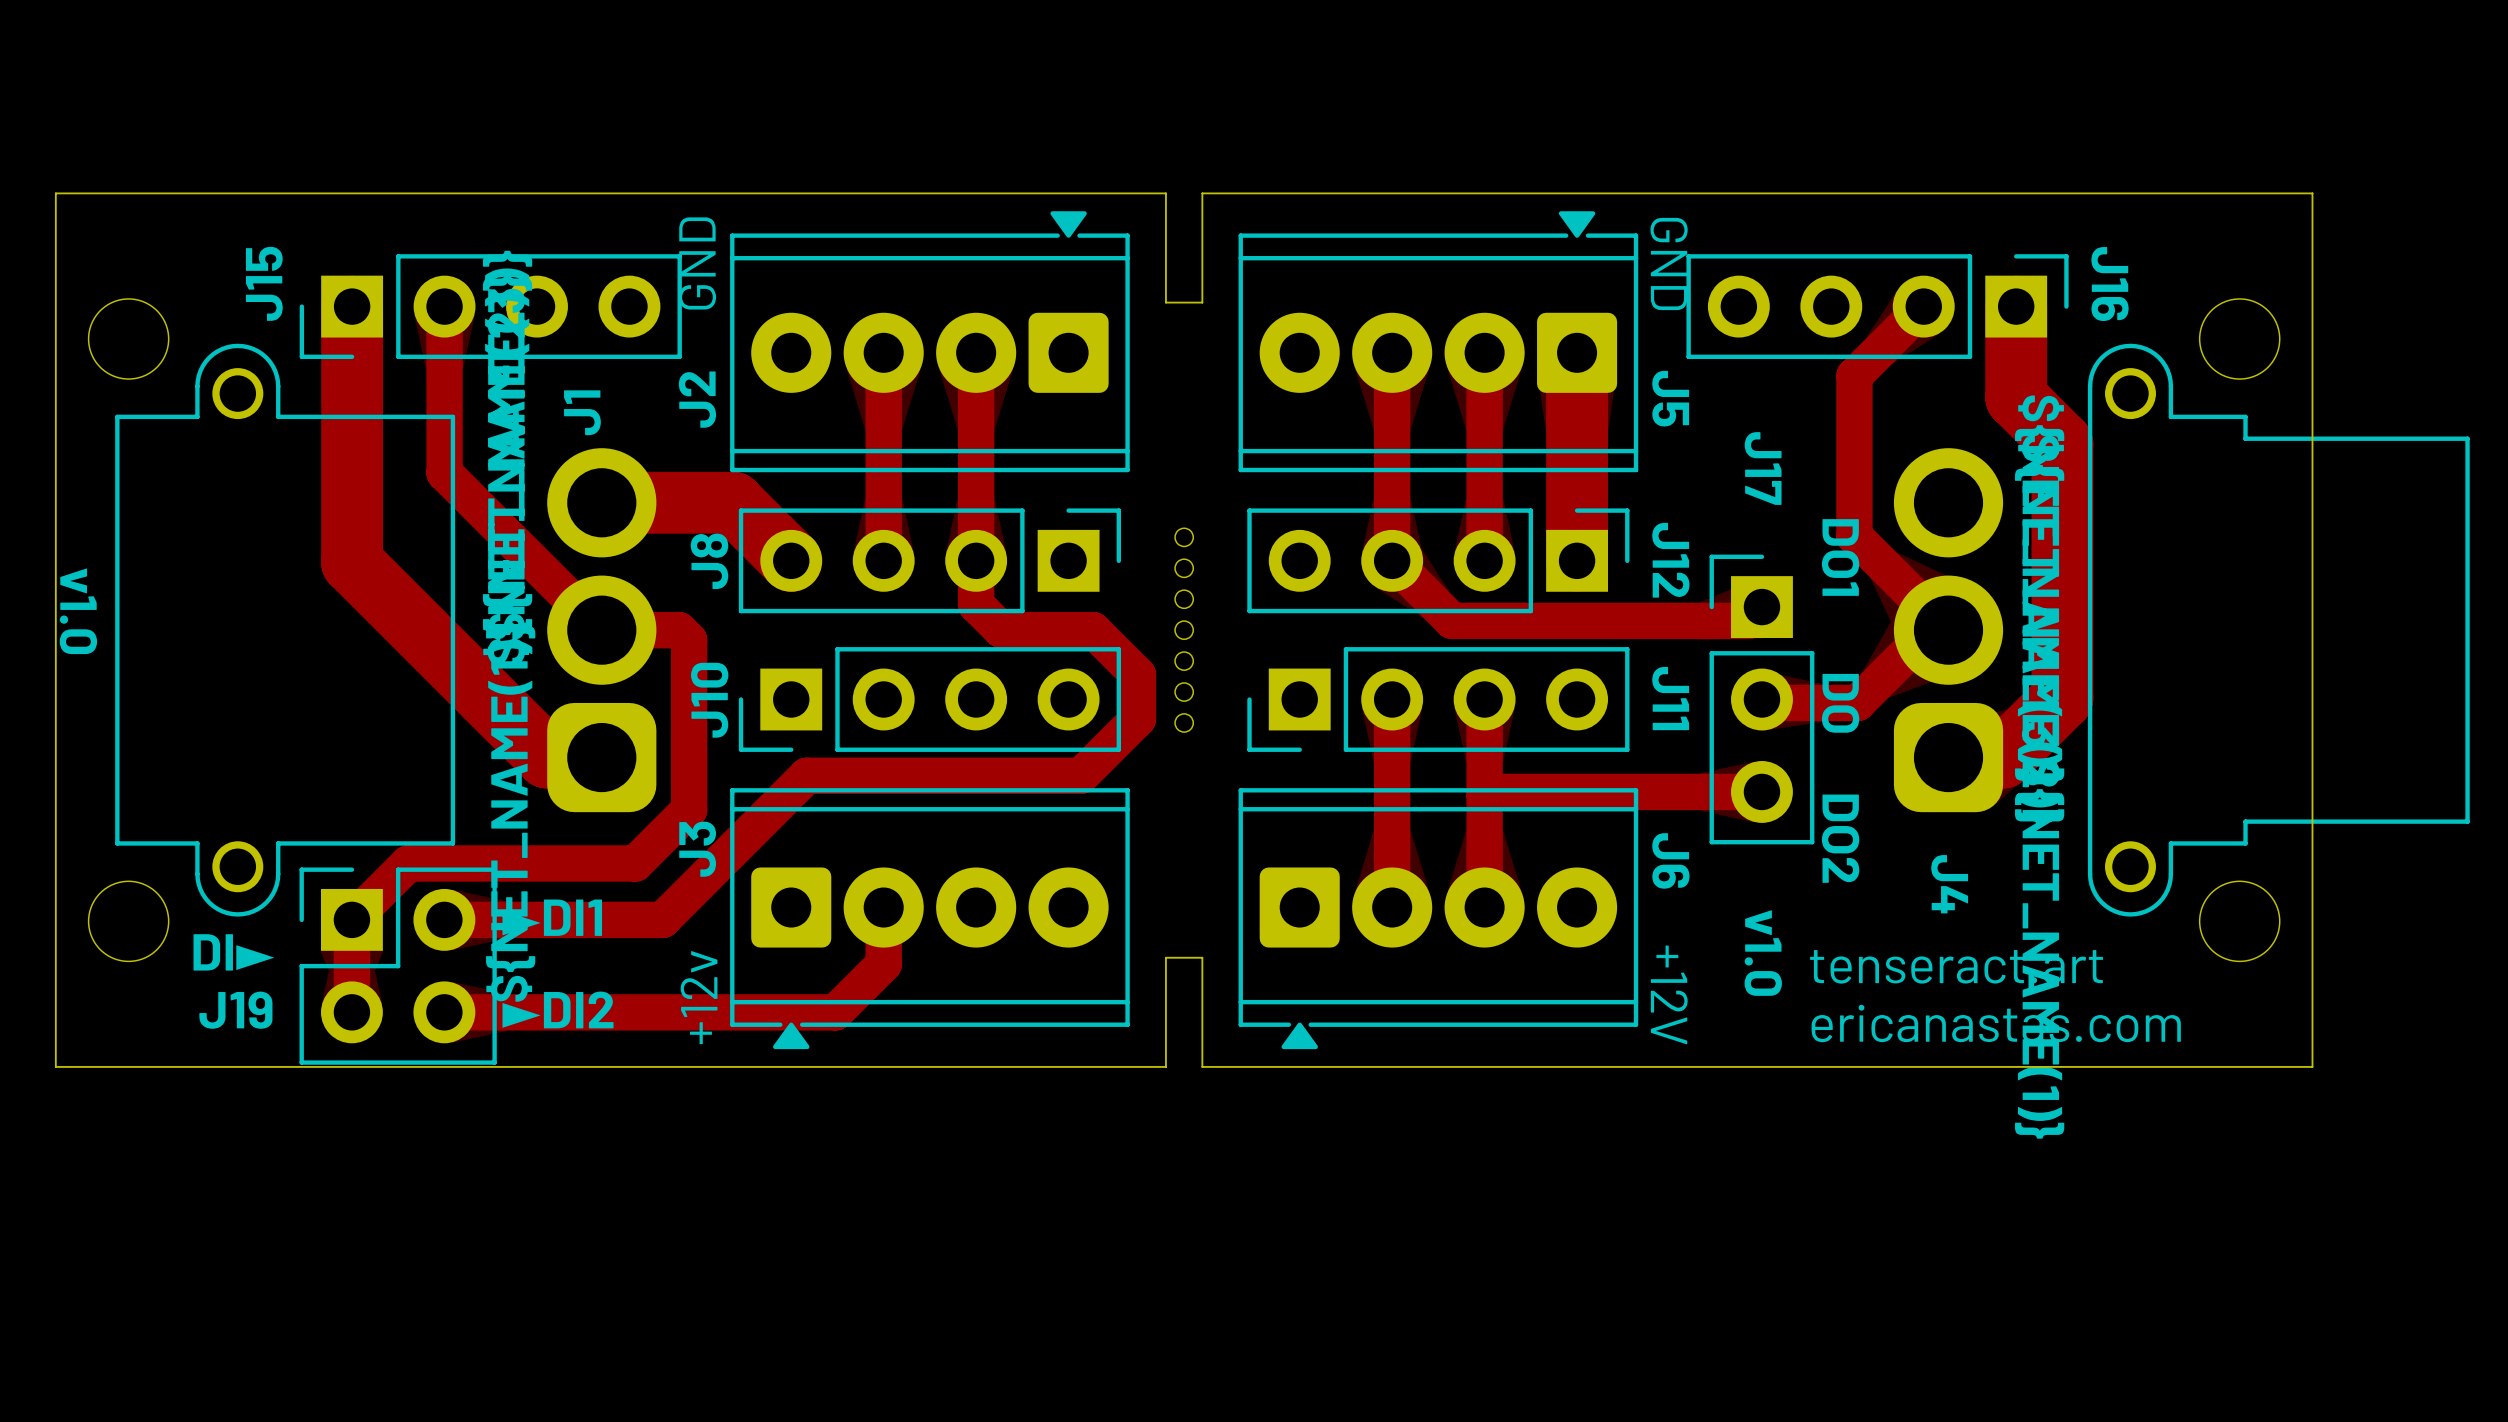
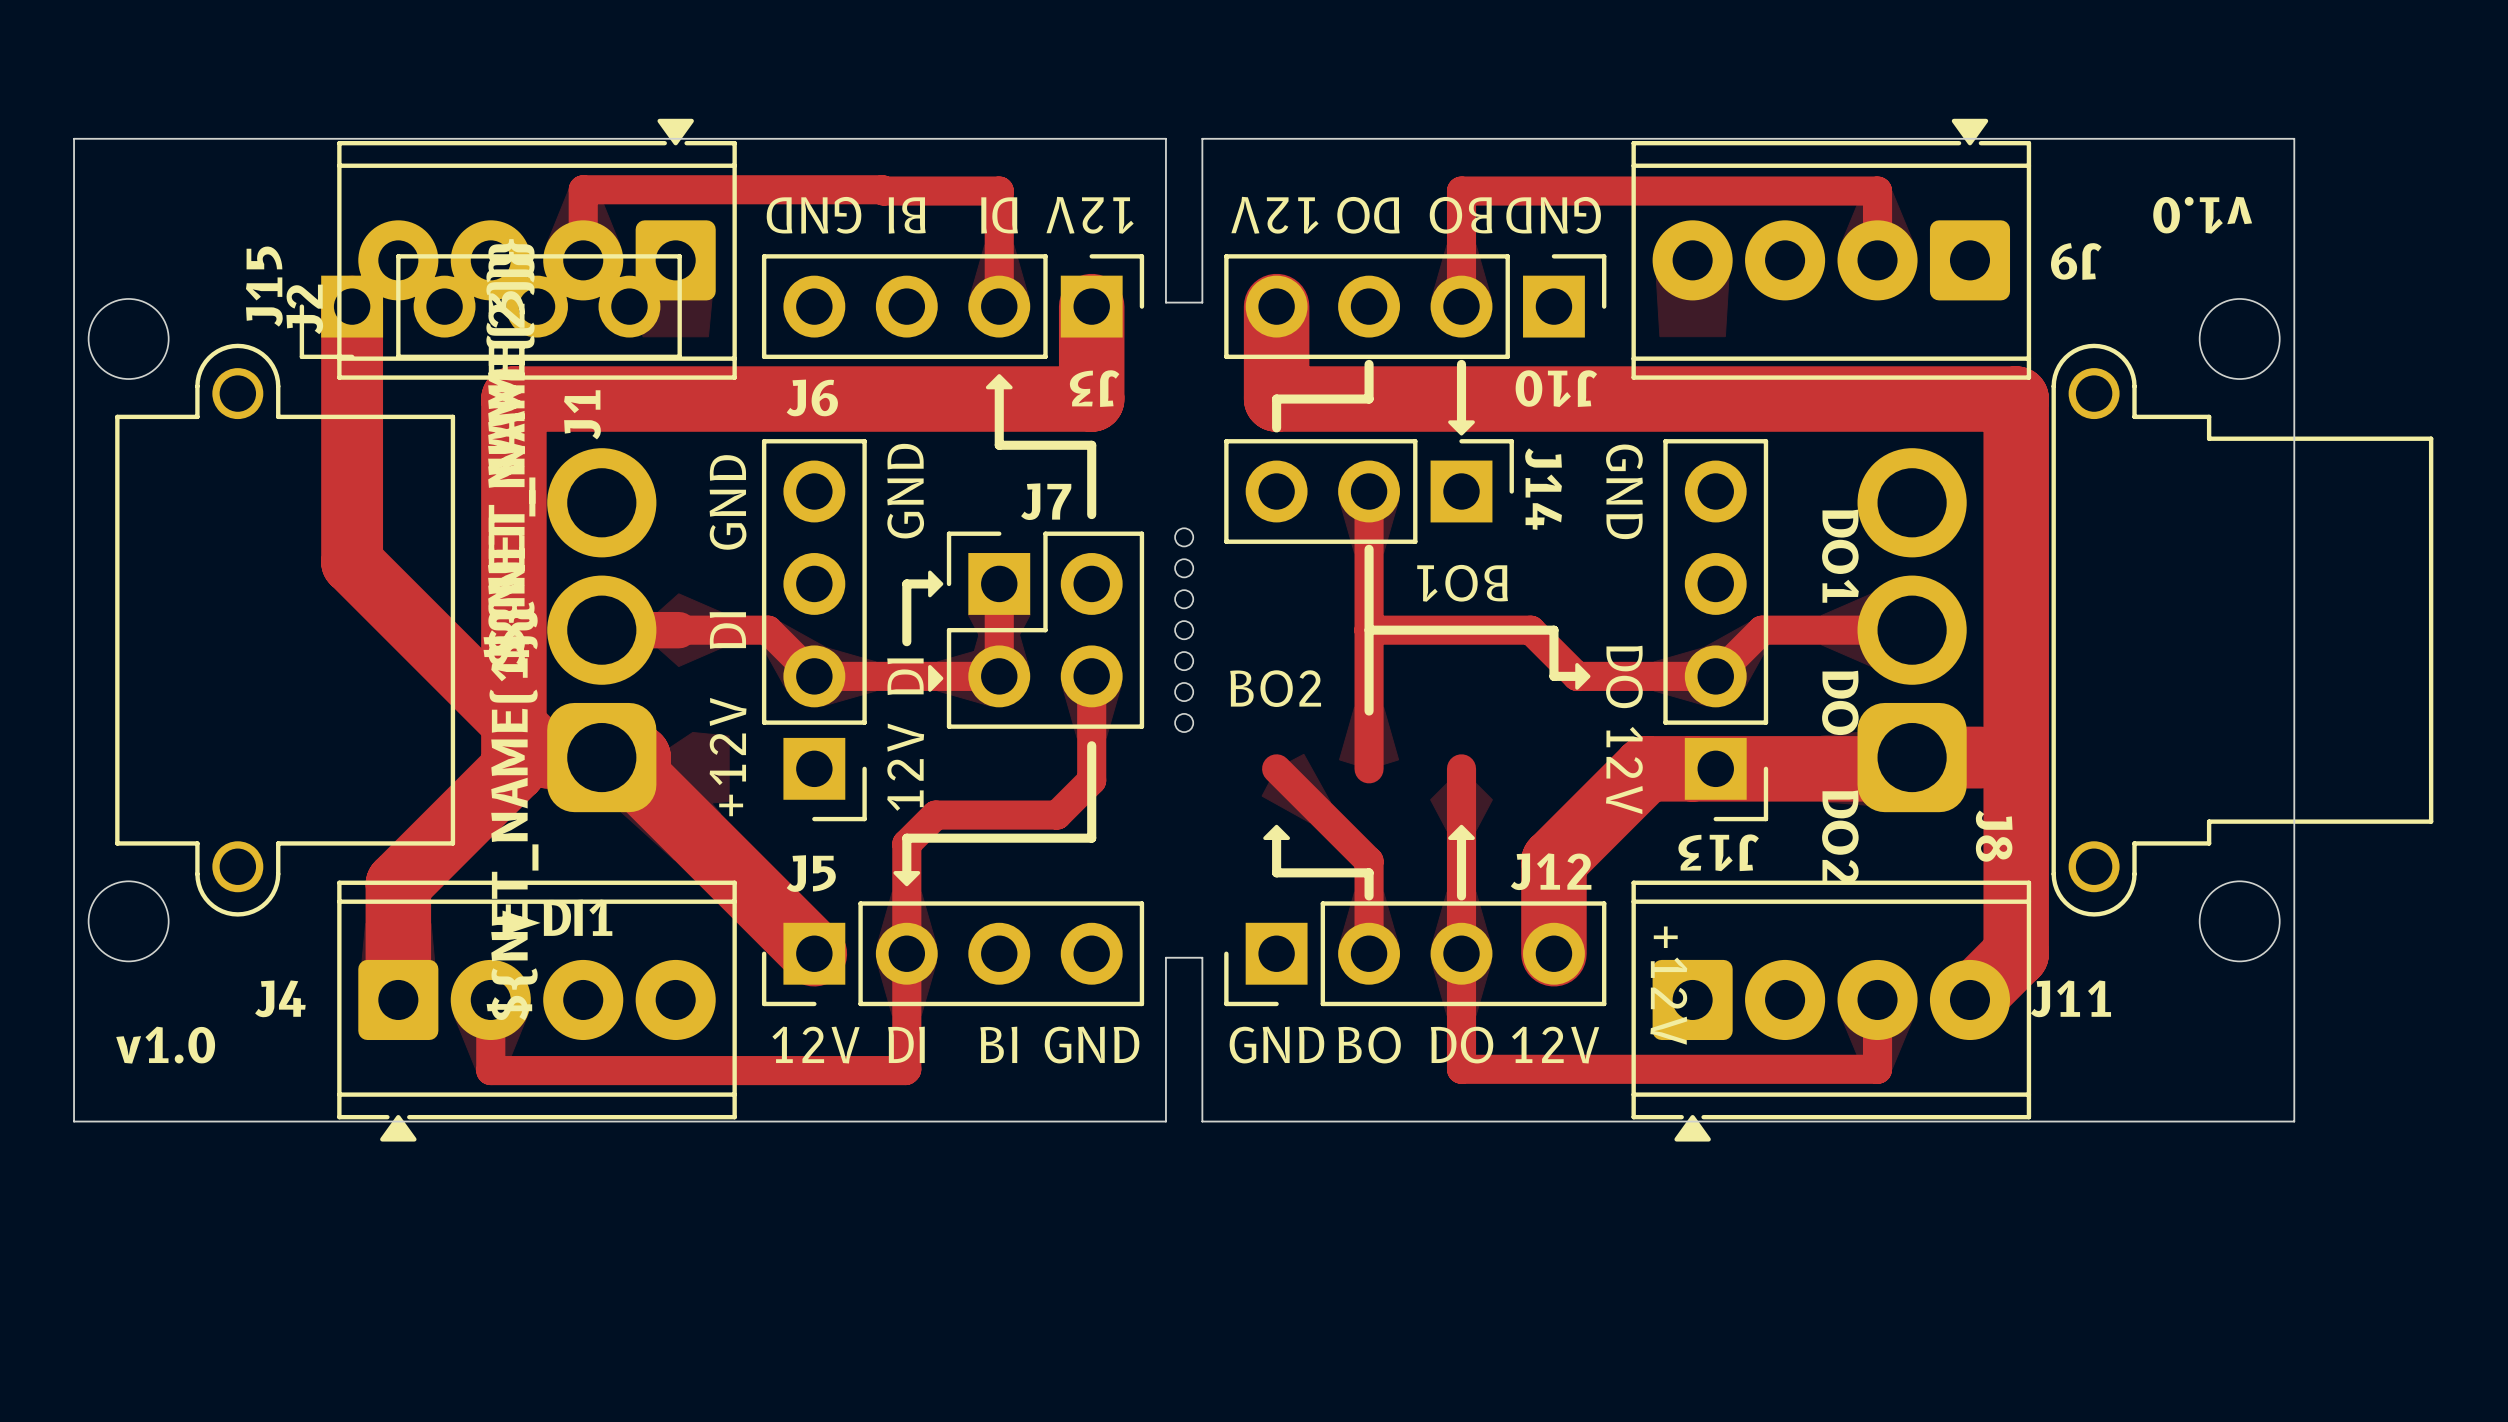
board edge: (1165, 193) (55, 193) (55, 1066) (1165, 1066) -> (1165, 193) (1165, 138) (74, 138) (74, 1121) (1165, 1121) (1165, 1066)
board edge: (1202, 193) (2312, 193) (2312, 1066) (1202, 1066) -> (1202, 193) (1202, 138) (2294, 138) (2294, 1121) (1202, 1121) (1202, 1066)
J5 footprint: [1238, 211, 1639, 473] -> [761, 901, 1145, 1007]
text: none -> BI (907, 215)
text: none -> DI (999, 215)
text: none -> 12V (1090, 215)
text: none -> 12V (1274, 215)
text: none -> DO (1368, 215)
text: none -> BO (1461, 215)
text: none -> v1.0 (2202, 215)
J9: none -> (1831, 249)
track: none -> (583, 260) (583, 189) (999, 191) (999, 306)
track: none -> (1877, 260) (1877, 191) (1461, 191) (1461, 306)
text rotation: 0° (697, 263) -> 90° counterclockwise (814, 215)
text rotation: 0° (1669, 263) -> 90° clockwise (1553, 215)
track: (444, 306) (444, 472) (601, 630) (638, 630) -> none
track: none -> (1091, 306) (1091, 399) (513, 399) (513, 768) (398, 884) (398, 999)
track: none -> (1276, 306) (1276, 399) (2016, 399) (2016, 953) (1969, 999)
J16: (1877, 306) -> none
track: (1923, 306) (1854, 375) (1854, 536) (1948, 630) (1930, 630) (1857, 702) (1765, 702) (1761, 699) -> none
track: (2016, 306) (2016, 397) (2062, 443) (2062, 698) (2003, 757) (1981, 757) -> none
J2 position: (929, 341) -> (537, 249)
J4 footprint: [1893, 343, 2470, 917] -> [337, 880, 737, 1142]
track: (883, 352) (883, 560) -> none
track: (976, 352) (976, 604) (1001, 630) (1093, 630) (1137, 674) (1137, 718) (1081, 775) (806, 775) (662, 919) (444, 919) -> none
track: (1392, 352) (1392, 560) (1452, 620) (1748, 620) (1761, 607) -> none
track: (1484, 352) (1484, 560) -> none
track: (1577, 352) (1577, 560) -> none
line: none -> (1369, 364) (1369, 399) (1276, 399) (1276, 427)
line: none -> (1461, 364) (1461, 422)
drawing: none -> [985, 374, 1013, 390]
line: none -> (999, 387) (999, 445) (1091, 445) (1091, 514)
J5 name position: J5 (1670, 398) -> J5 (811, 873)
drawing: none -> [1448, 420, 1475, 436]
text: none -> GND (905, 491)
track: none -> (1369, 491) (1369, 768)
J14: none -> (1369, 491)
text: none -> GND (1624, 491)
track: (601, 502) (733, 502) (791, 560) -> none
text: none -> GND (728, 502)
J8 footprint: [738, 508, 1122, 614] -> [1857, 343, 2434, 917]
line: none -> (1369, 549) (1369, 711)
J12 rotation: 0° (1438, 560) -> 180° (1415, 953)
J12 position: (1438, 560) -> (1415, 953)
J12 name position: J12 (1670, 560) -> J12 (1551, 871)
J8 name position: J8 (709, 561) -> J8 (1994, 836)
drawing: none -> [928, 570, 944, 598]
line: none -> (929, 583) (906, 583) (906, 641)
text: none -> BO1 (1462, 583)
text rotation: 0° (78, 611) -> 90° counterclockwise (165, 1045)
text position: v1.0 (78, 611) -> v1.0 (165, 1045)
track: (679, 630) (689, 640) (689, 809) (635, 863) (408, 863) (351, 919) (351, 1012) -> (679, 630) (768, 630) (814, 676) (999, 676) (999, 583)
text: none -> DI (727, 630)
J7: none -> (1045, 630)
track: none -> (1369, 630) (1530, 630) (1577, 676) (1715, 676) (1761, 630) (1912, 630)
line: none -> (1369, 630) (1553, 630) (1553, 676) (1577, 676)
J13: none -> (1715, 630)
J11 footprint: [1247, 647, 1630, 752] -> [1631, 880, 2032, 1142]
drawing: none -> [1575, 663, 1591, 690]
drawing: none -> [928, 665, 944, 692]
text: none -> DI (905, 676)
track: none -> (1091, 676) (1091, 780) (1057, 815) (935, 815) (906, 843) (905, 1070) (490, 1070) (490, 999)
text: none -> DO (1624, 676)
text: none -> BO2 (1275, 688)
J10 rotation: 0° (929, 699) -> 180° (1415, 306)
J10 position: (929, 699) -> (1415, 306)
track: (1392, 699) (1392, 907) -> none
track: (1484, 699) (1484, 907) -> none
J17: (1761, 699) -> none
J10 name position: J10 (709, 700) -> J10 (1556, 388)
line: none -> (1091, 745) (1091, 838) (906, 838) (906, 872)
track: none -> (601, 757) (638, 757) (638, 777) (814, 953)
text: none -> +12V (728, 757)
track: none -> (1948, 757) (1912, 757) (1900, 768) (1646, 768) (1553, 861) (1553, 953)
text: none -> 12V (905, 767)
track: none -> (1276, 768) (1369, 861) (1369, 953)
track: none -> (1461, 768) (1461, 1069) (1877, 1069) (1877, 999)
text: none -> 12V (1624, 770)
J3 footprint: [730, 788, 1130, 1050] -> [761, 254, 1145, 360]
J6 footprint: [1238, 788, 1639, 1050] -> [761, 439, 867, 822]
track: (1761, 791) (1486, 791) (1484, 793) -> none
drawing: none -> [1263, 824, 1290, 841]
drawing: none -> [1448, 824, 1475, 841]
line: none -> (1276, 838) (1276, 872) (1369, 872) (1369, 895)
line: none -> (1461, 838) (1461, 895)
J3 name position: J3 (697, 849) -> J3 (1094, 388)
J6 name position: J6 (1670, 860) -> J6 (812, 397)
drawing: none -> [893, 871, 921, 887]
J4 name position: J4 (1949, 884) -> J4 (280, 998)
track: (883, 907) (883, 964) (835, 1012) (444, 1012) -> none
text: DI► (233, 952) -> none
text: v1.0 (1763, 953) -> none
J19: (398, 966) -> none
text: tenseract.art (1956, 966) -> none
text: +12v (699, 997) -> none
text: ►DI2 (558, 1009) -> none
text: ericanastas.com (1996, 1023) -> none
text: none -> 12V (816, 1045)
text: none -> DI (906, 1044)
text: none -> BI (998, 1044)
text: none -> GND (1092, 1045)
text: none -> GND (1276, 1045)
text: none -> BO (1369, 1045)
text: none -> DO (1462, 1045)
text: none -> 12V (1555, 1045)

